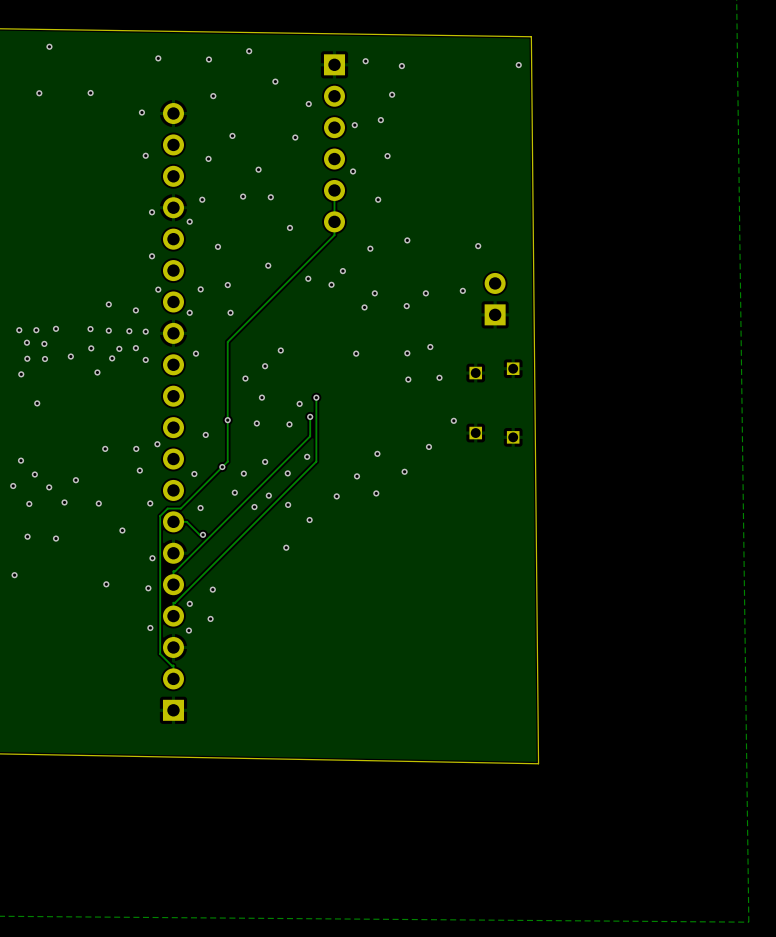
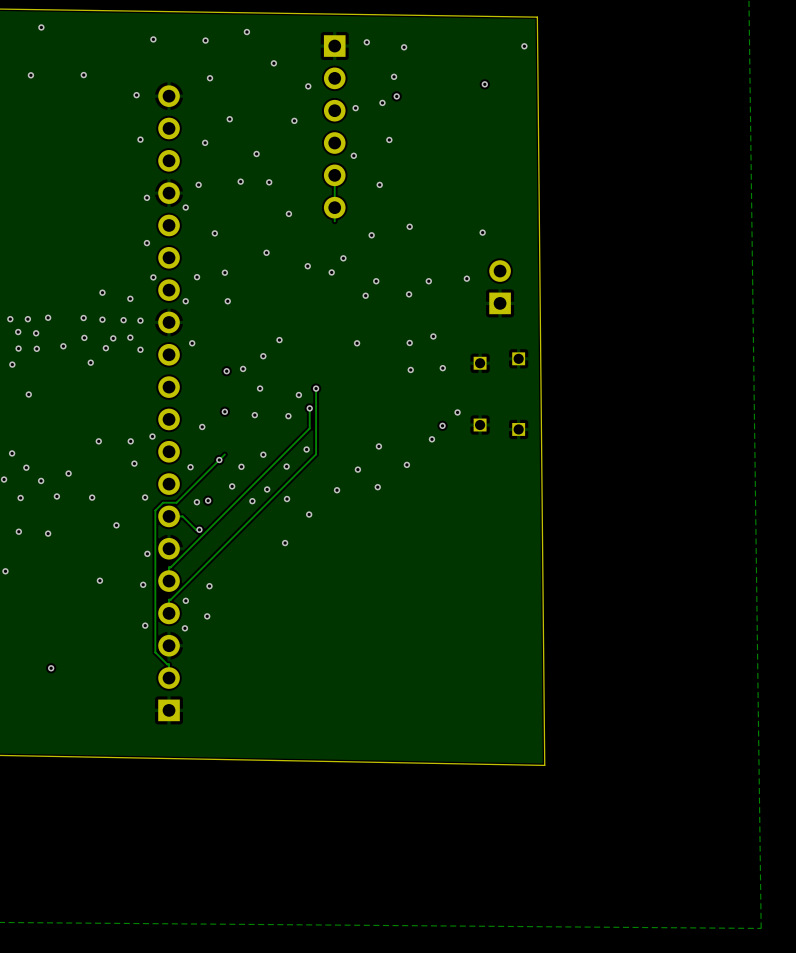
via: none -> (484, 84)
via: none -> (396, 96)
track: (334, 235) (227, 341) (227, 461) -> none
via: none -> (226, 371)
via: none -> (442, 425)
via: none -> (208, 500)
via: none -> (51, 668)

